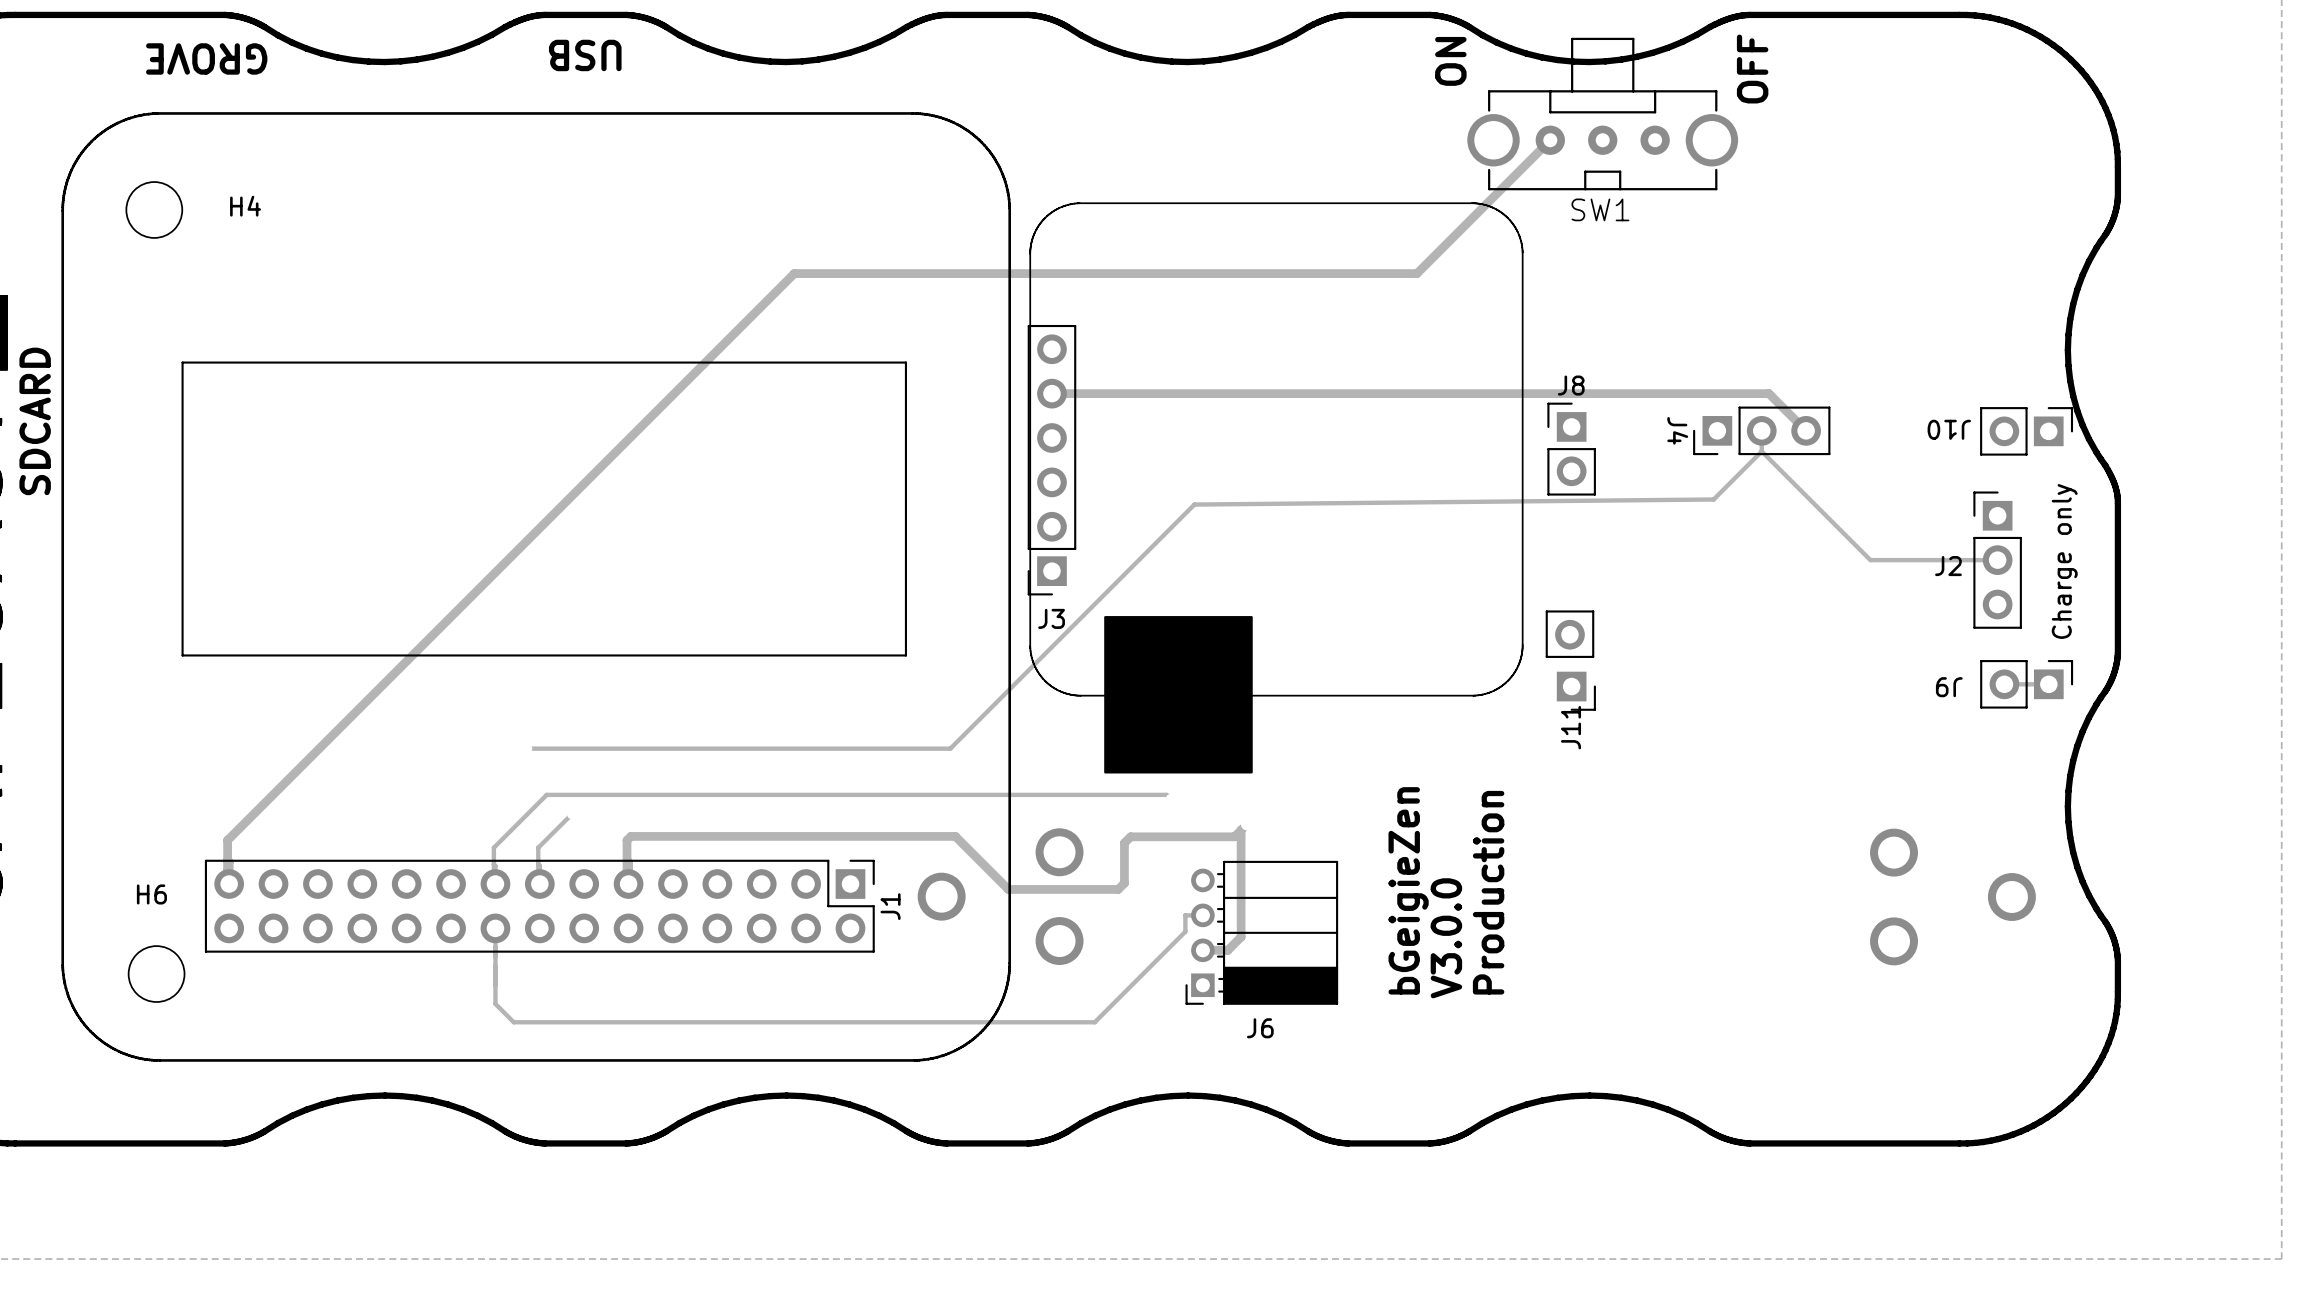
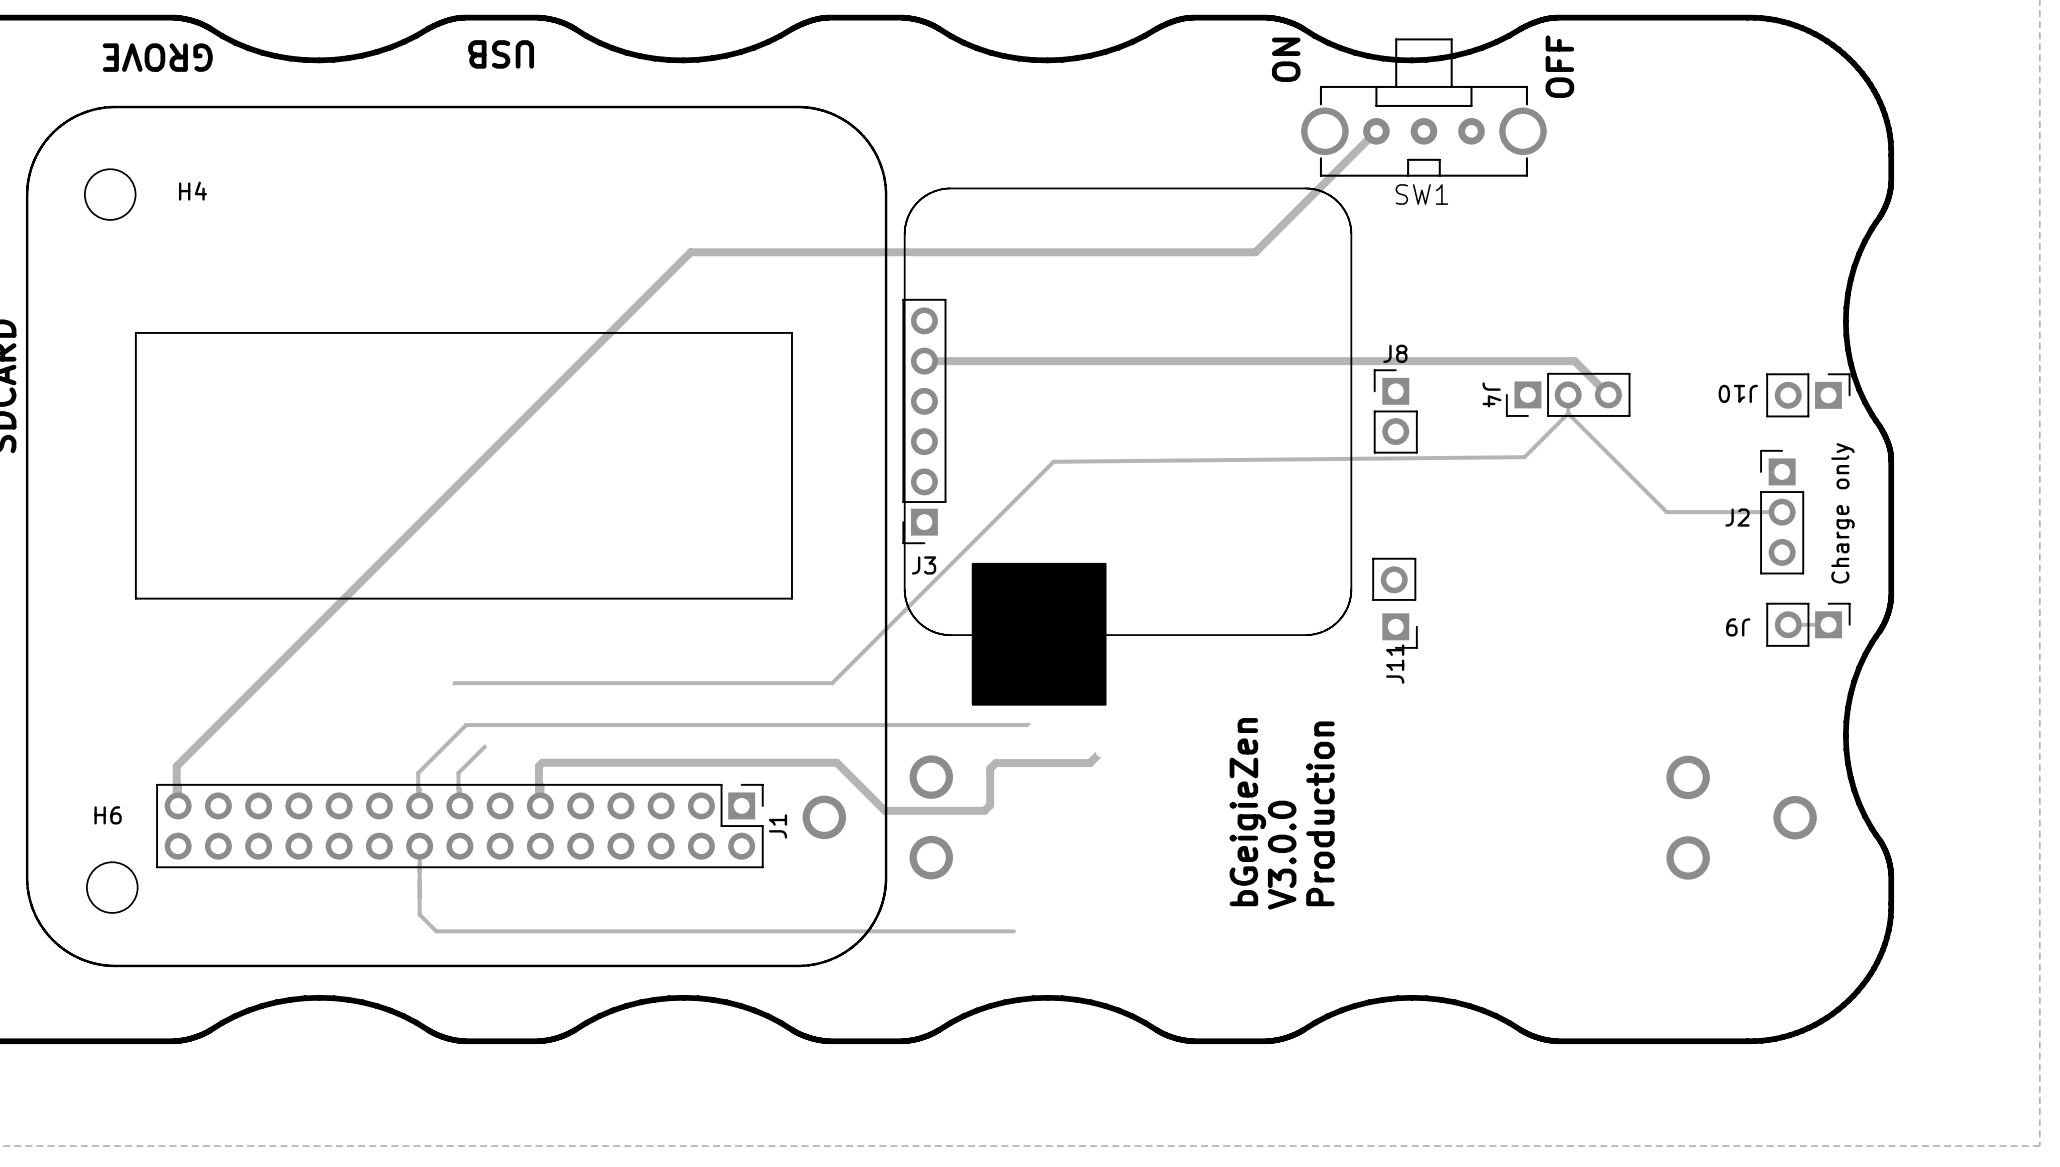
track: (1241, 830) (1241, 937) (1227, 950) (1202, 950) -> none
track: (1202, 915) (1185, 915) (1185, 931) (1094, 1022) -> (1013, 931) (963, 931)
J6: (1261, 932) -> none

